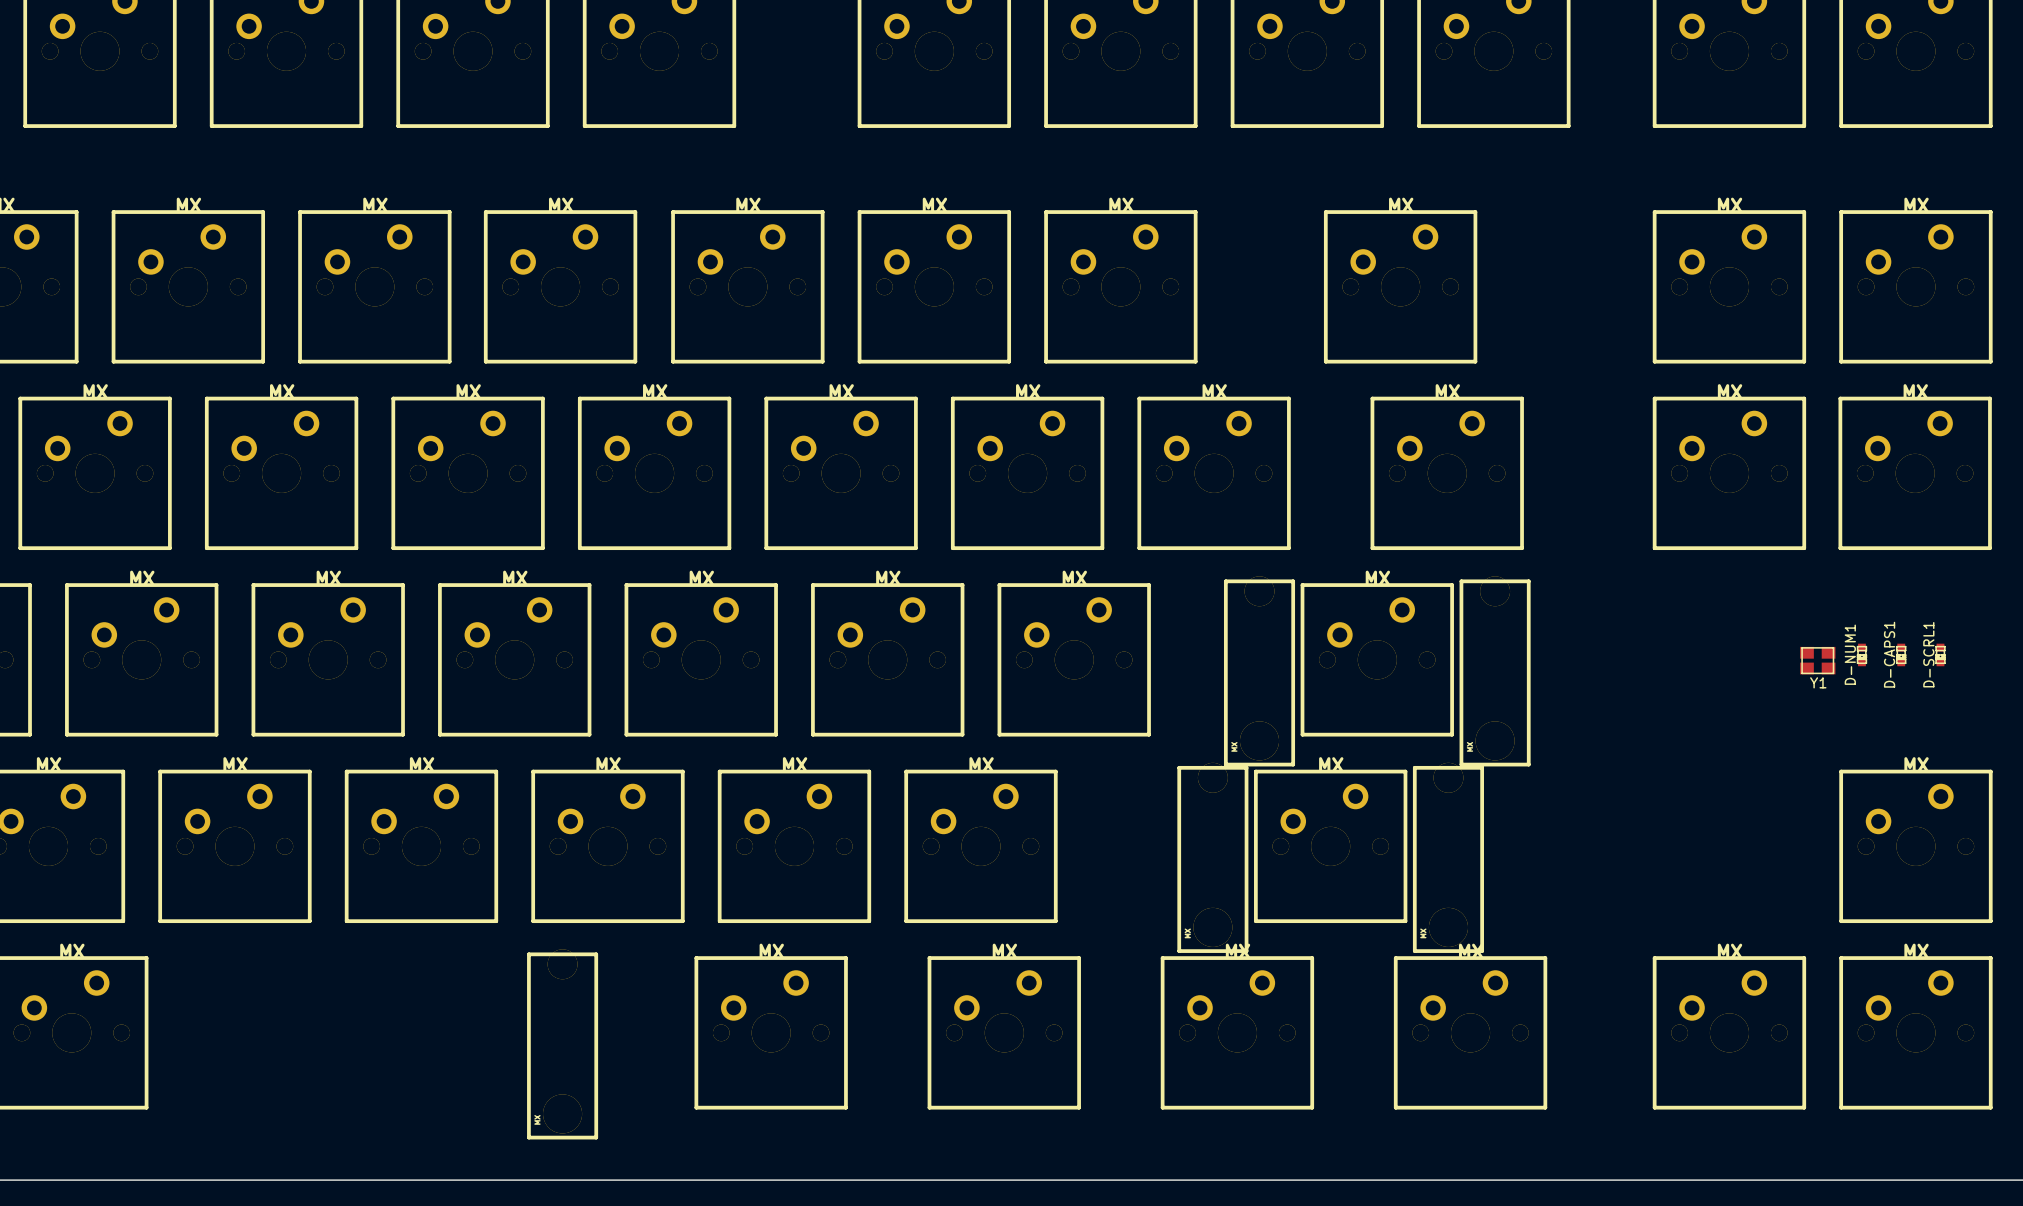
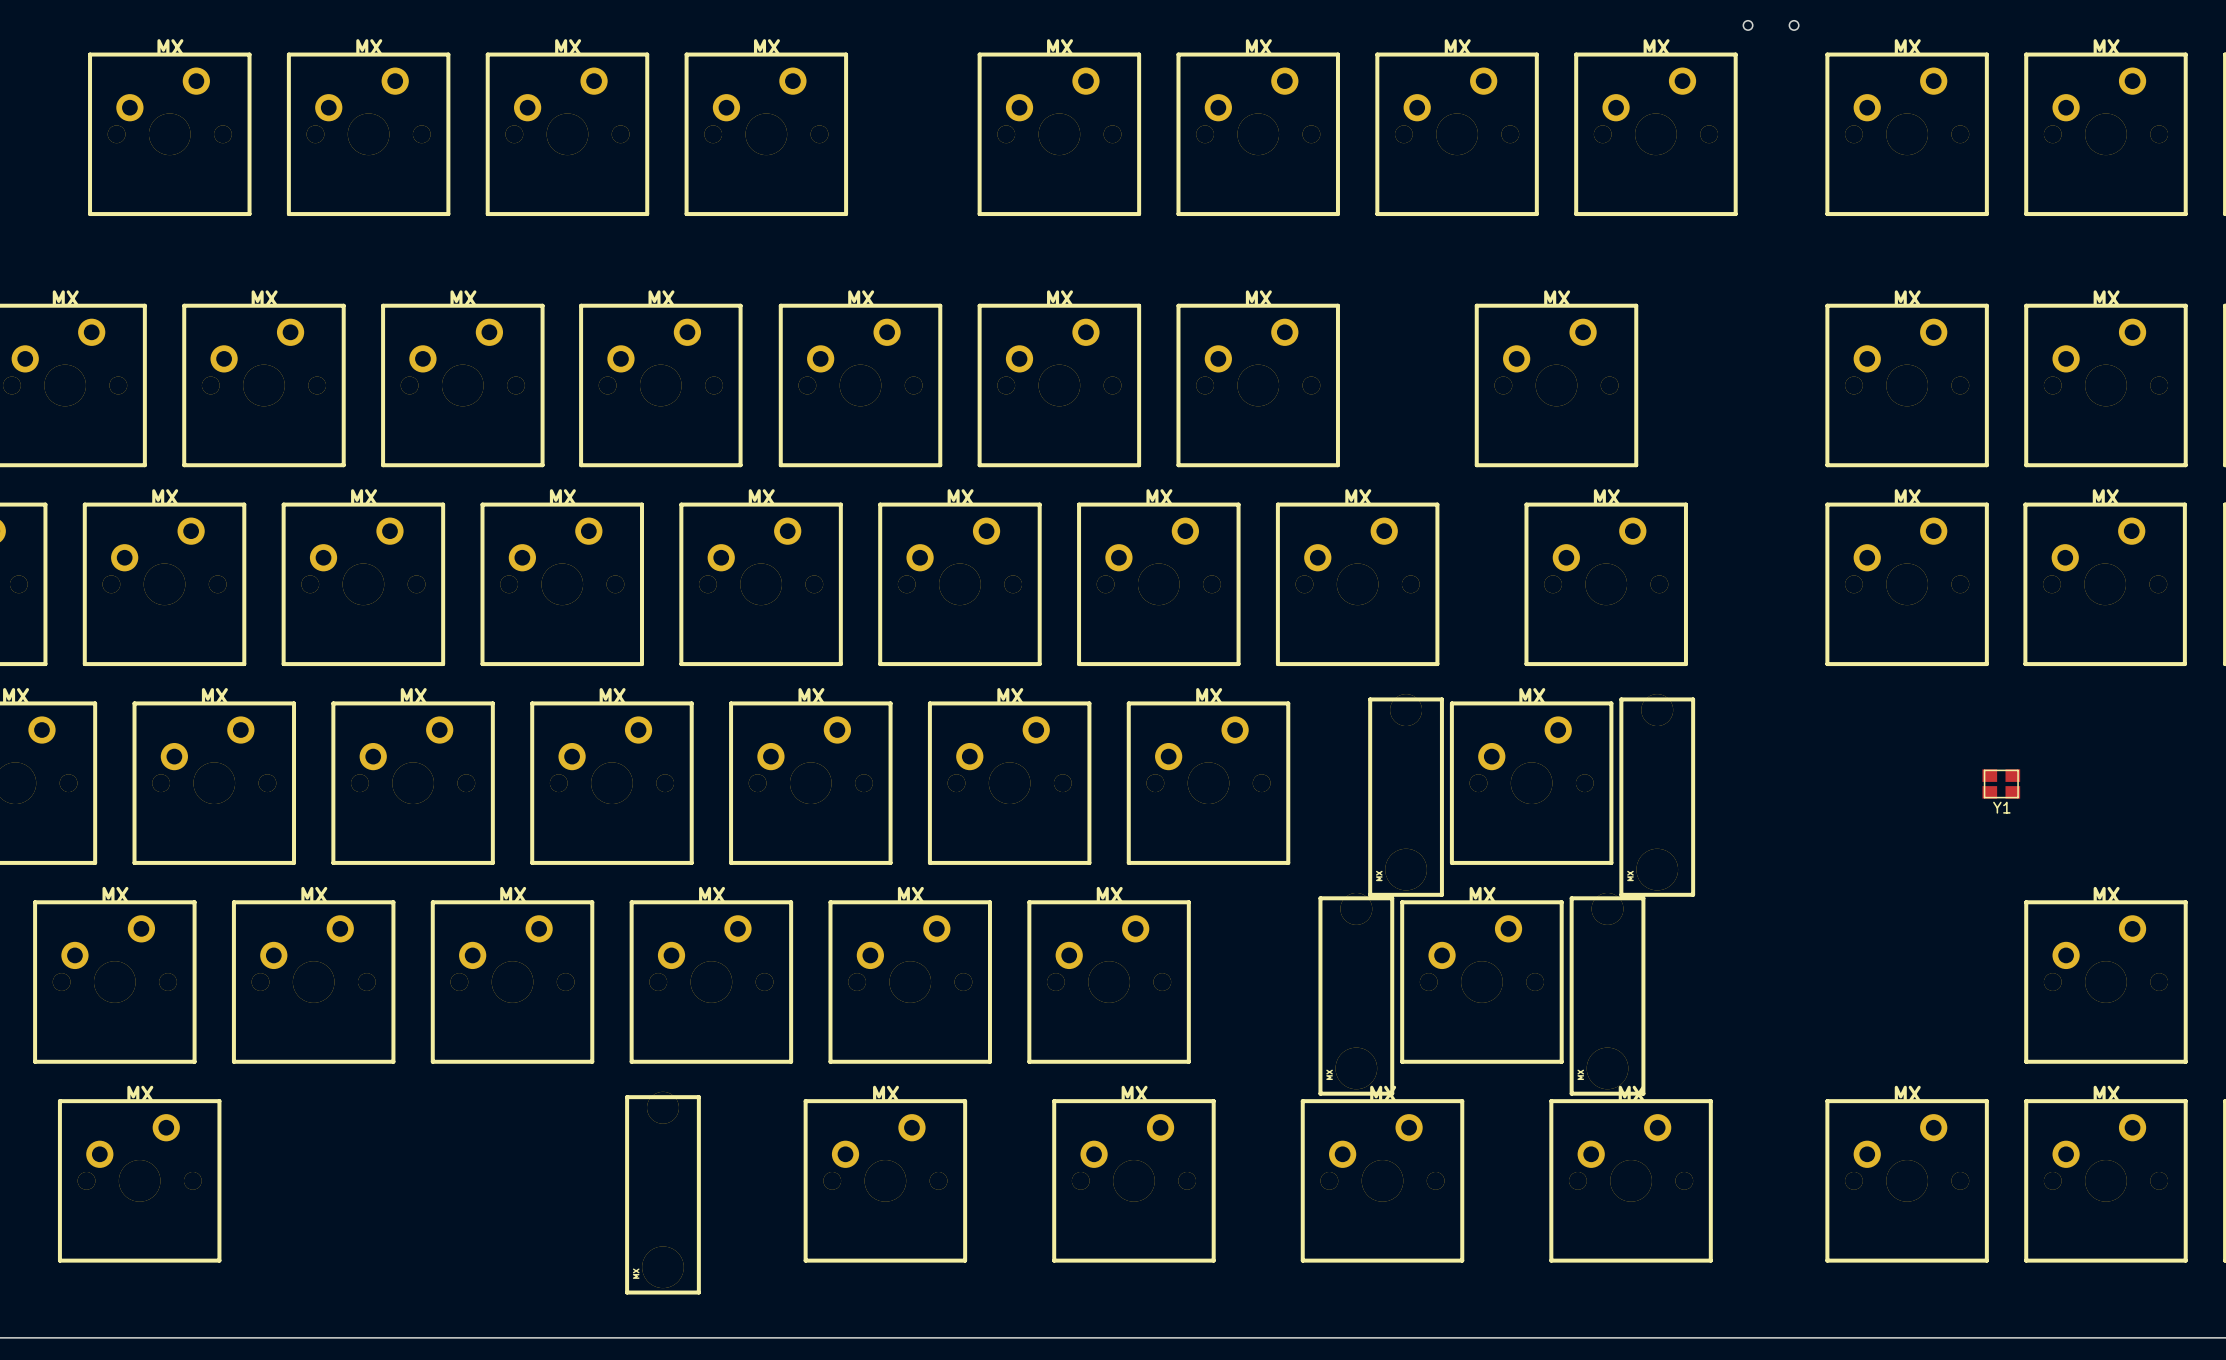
D-NUM1: (1861, 654) -> none
D-CAPS1: (1901, 654) -> none
D-SCRL1: (1940, 654) -> none

